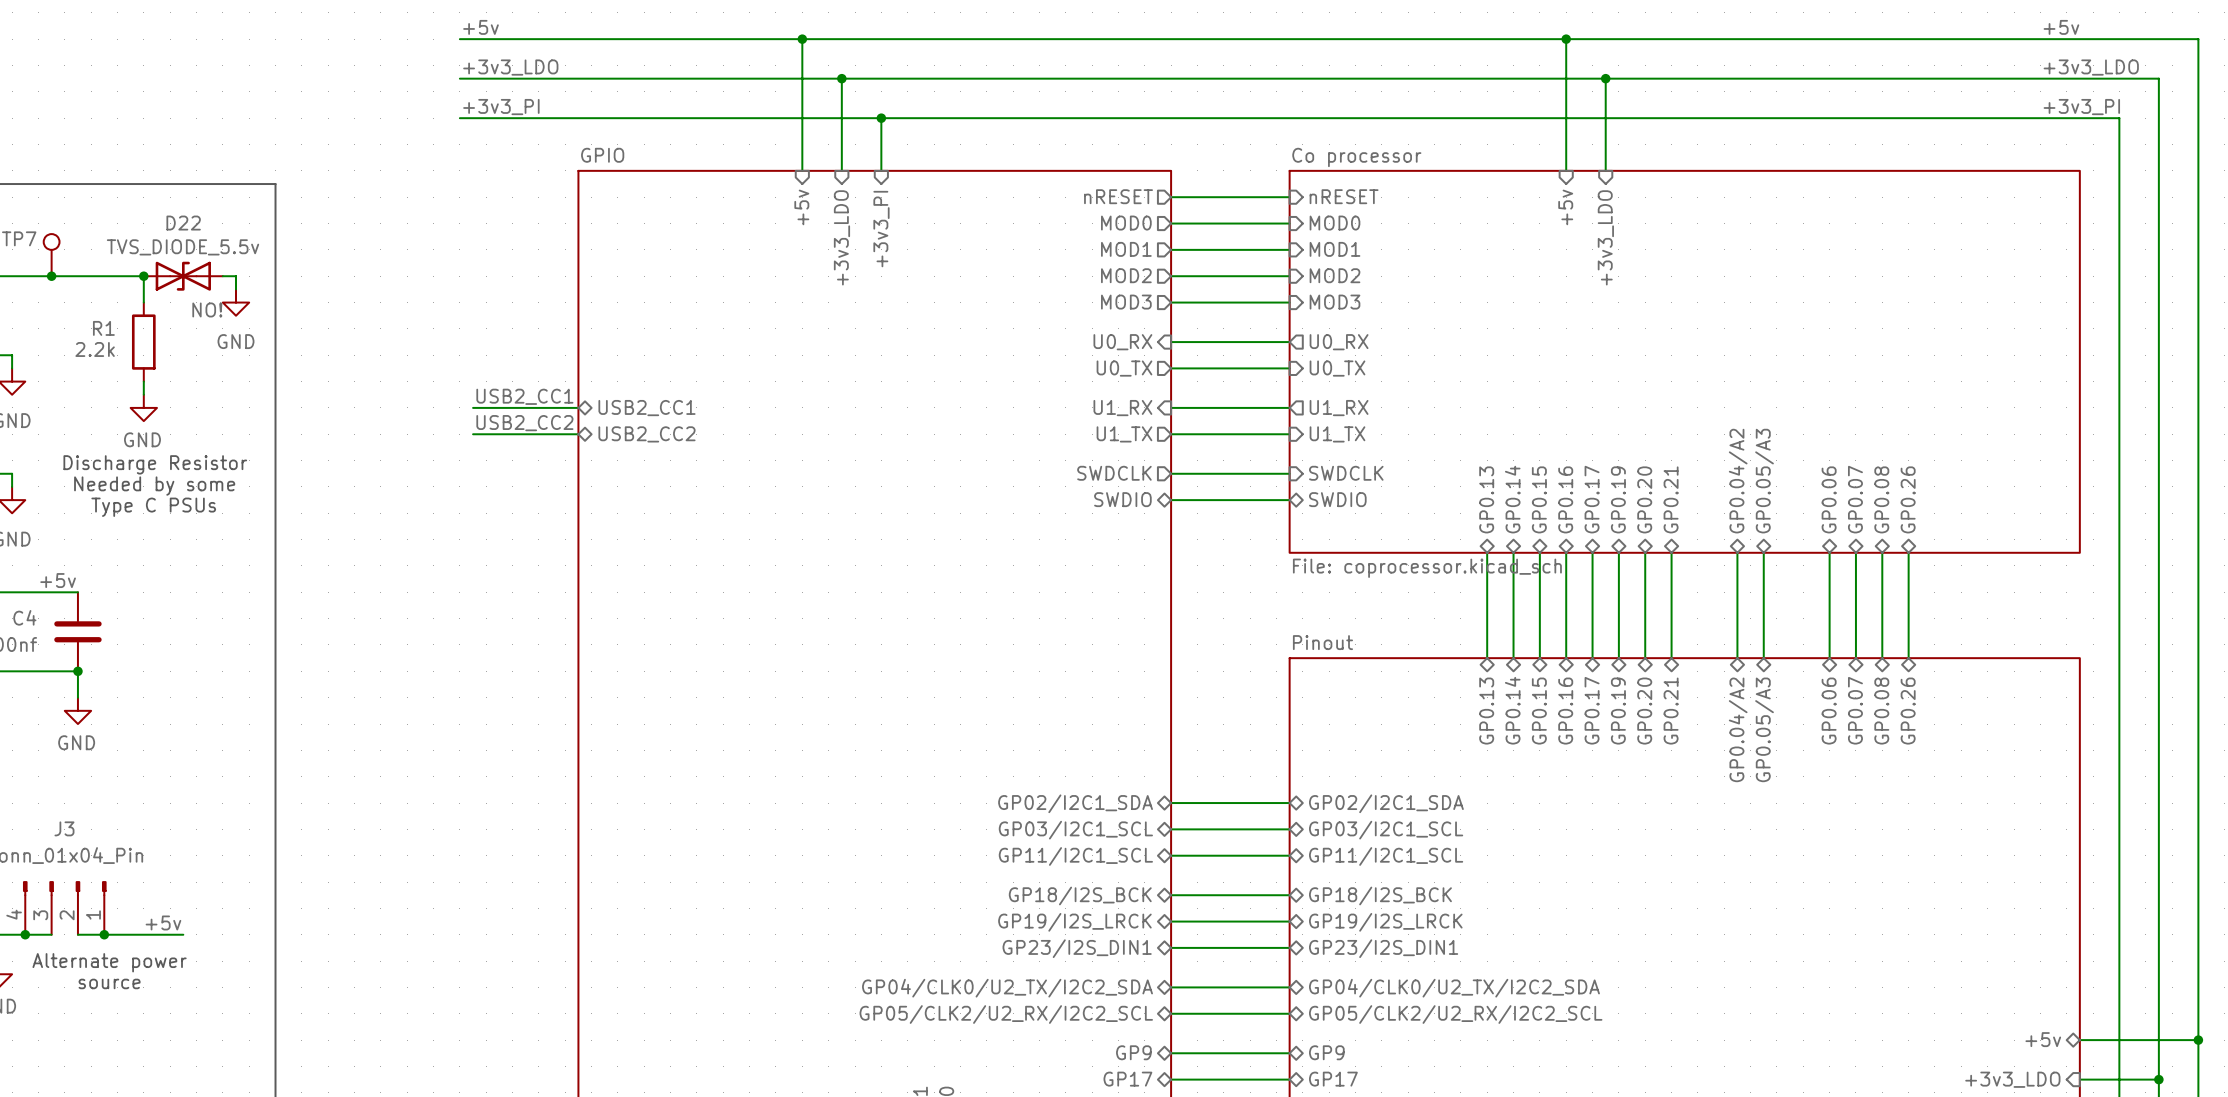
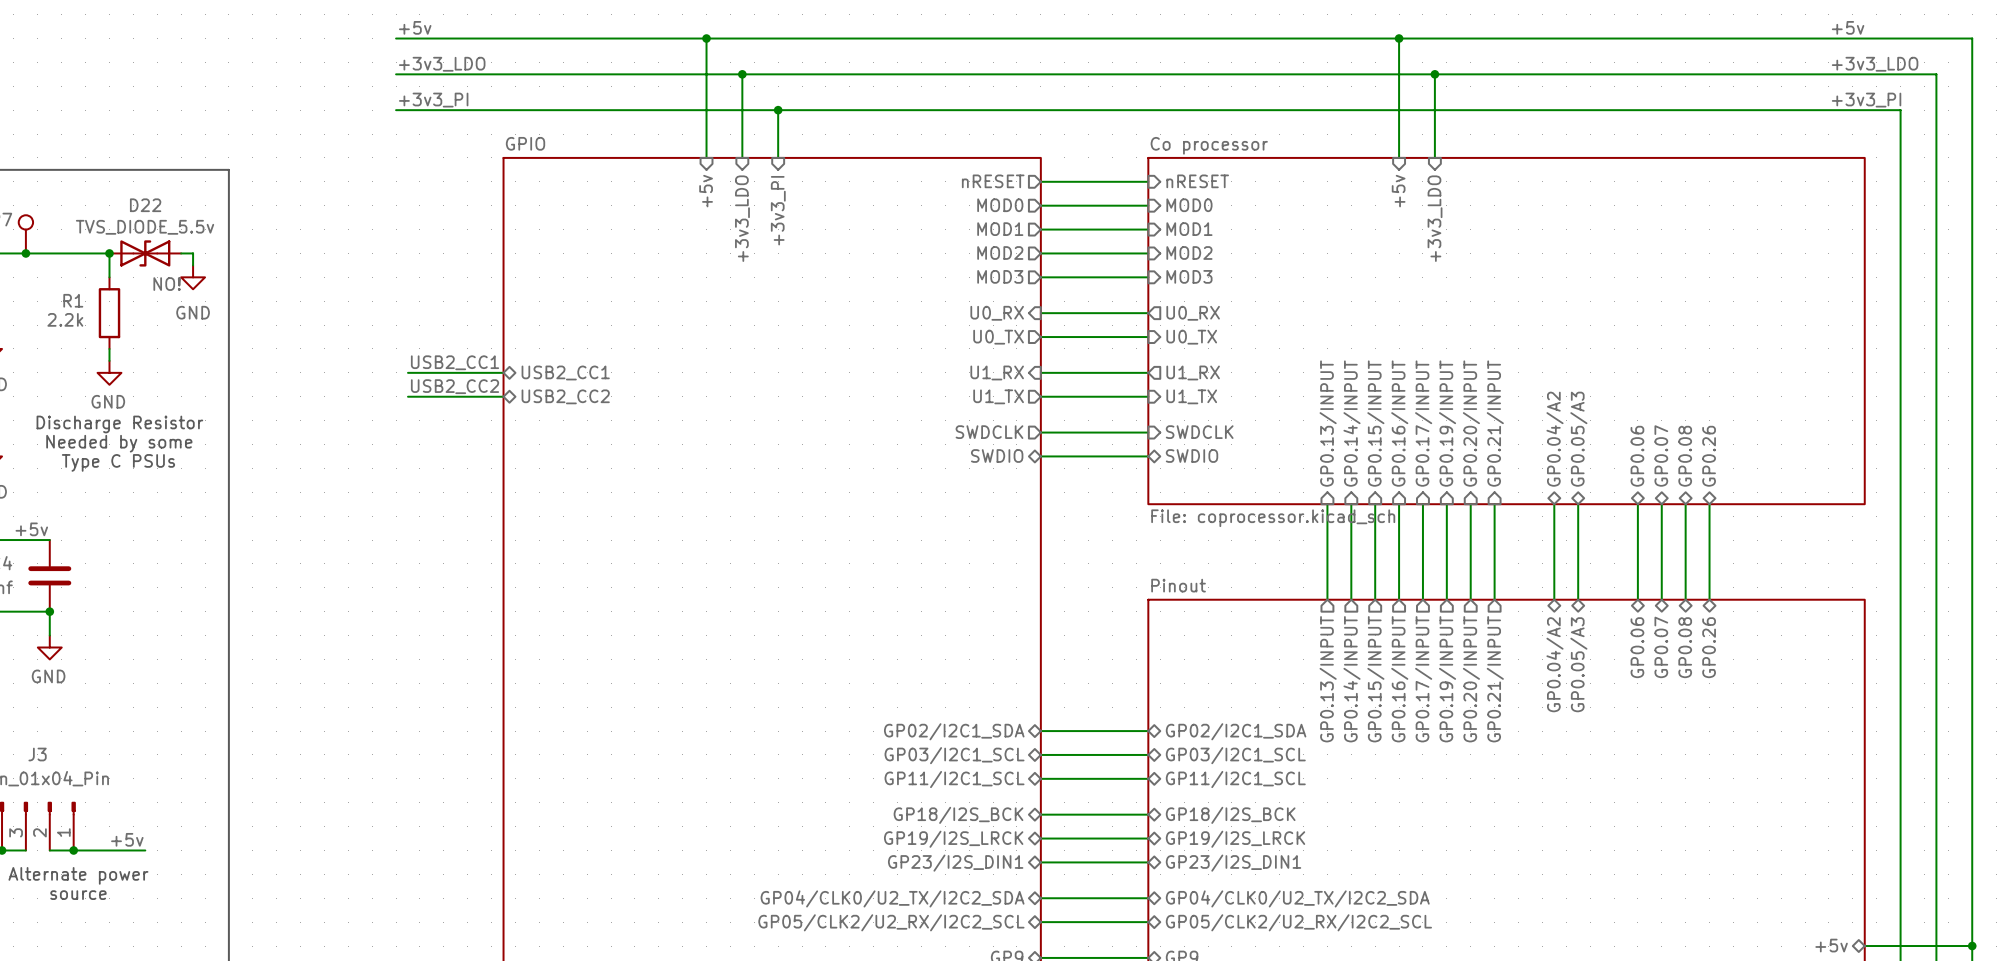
sheet pin shape: bidirectional (1486, 499) -> input (1328, 423)
sheet pin: GP0.13 (1486, 499) -> GP0.13/INPUT (1328, 423)
sheet pin shape: bidirectional (1512, 499) -> input (1352, 423)
sheet pin: GP0.14 (1512, 499) -> GP0.14/INPUT (1352, 423)
sheet pin shape: bidirectional (1539, 499) -> input (1375, 423)
sheet pin: GP0.15 (1539, 499) -> GP0.15/INPUT (1375, 423)
sheet pin shape: bidirectional (1565, 499) -> input (1399, 423)
sheet pin: GP0.16 (1565, 499) -> GP0.16/INPUT (1399, 423)
sheet pin shape: bidirectional (1592, 499) -> input (1423, 423)
sheet pin: GP0.17 (1592, 499) -> GP0.17/INPUT (1423, 423)
sheet pin shape: bidirectional (1618, 499) -> input (1447, 423)
sheet pin: GP0.19 (1618, 499) -> GP0.19/INPUT (1447, 423)
sheet pin shape: bidirectional (1644, 499) -> input (1471, 423)
sheet pin: GP0.20 (1644, 499) -> GP0.20/INPUT (1471, 423)
sheet pin shape: bidirectional (1671, 499) -> input (1495, 423)
sheet pin: GP0.21 (1671, 499) -> GP0.21/INPUT (1495, 423)
sheet pin shape: bidirectional (1512, 710) -> output (1352, 679)
sheet pin: GP0.14 (1512, 710) -> GP0.14/INPUT (1352, 679)
sheet pin shape: bidirectional (1592, 710) -> output (1423, 679)
sheet pin: GP0.17 (1592, 710) -> GP0.17/INPUT (1423, 679)
sheet pin shape: bidirectional (1486, 711) -> output (1328, 679)
sheet pin: GP0.13 (1486, 711) -> GP0.13/INPUT (1328, 679)
sheet pin shape: bidirectional (1539, 711) -> output (1375, 679)
sheet pin: GP0.15 (1539, 711) -> GP0.15/INPUT (1375, 679)
sheet pin shape: bidirectional (1565, 711) -> output (1399, 679)
sheet pin: GP0.16 (1565, 711) -> GP0.16/INPUT (1399, 679)
sheet pin shape: bidirectional (1618, 711) -> output (1447, 679)
sheet pin: GP0.19 (1618, 711) -> GP0.19/INPUT (1447, 679)
sheet pin shape: bidirectional (1644, 711) -> output (1471, 679)
sheet pin: GP0.20 (1644, 711) -> GP0.20/INPUT (1471, 679)
sheet pin shape: bidirectional (1671, 711) -> output (1495, 679)
sheet pin: GP0.21 (1671, 711) -> GP0.21/INPUT (1495, 679)

